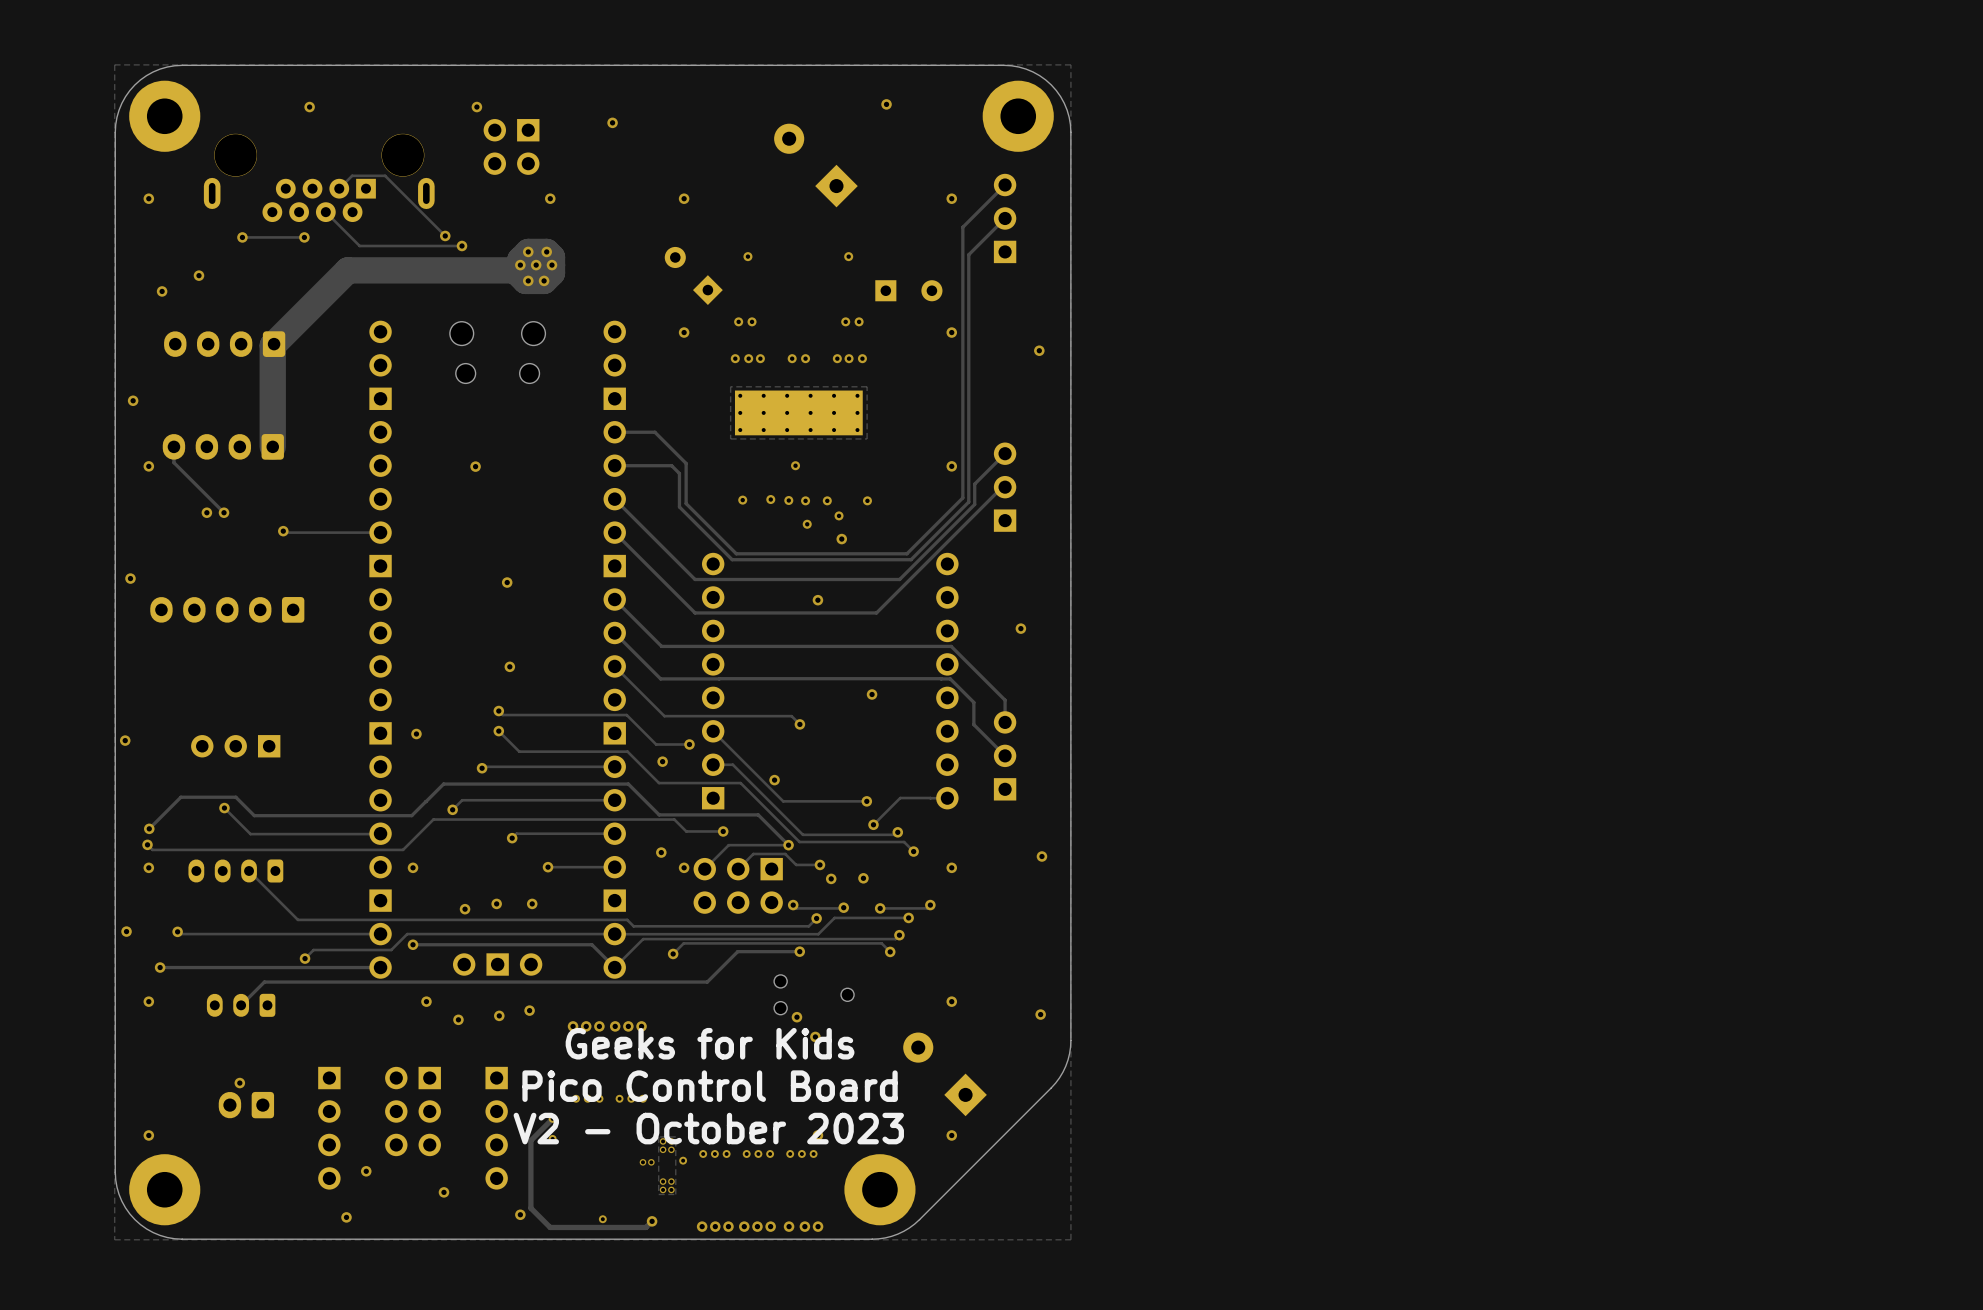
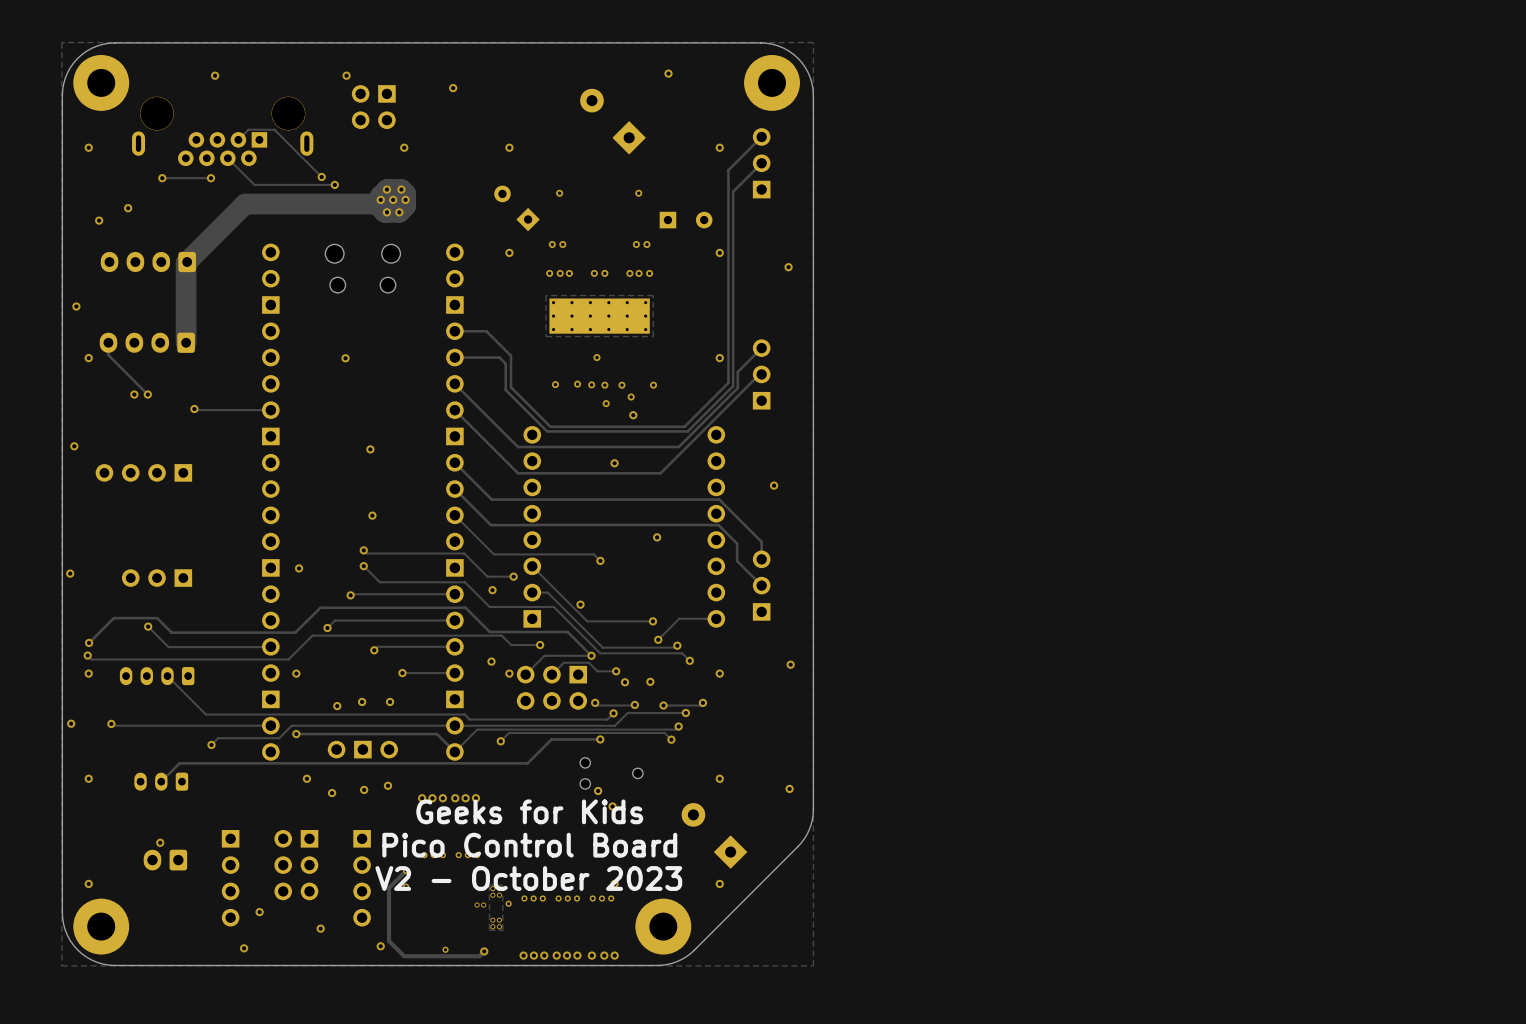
part footprint: [150, 597, 305, 623] -> [95, 464, 193, 482]
via: (160, 967) -> none
track: (380, 967) (160, 967) -> none

